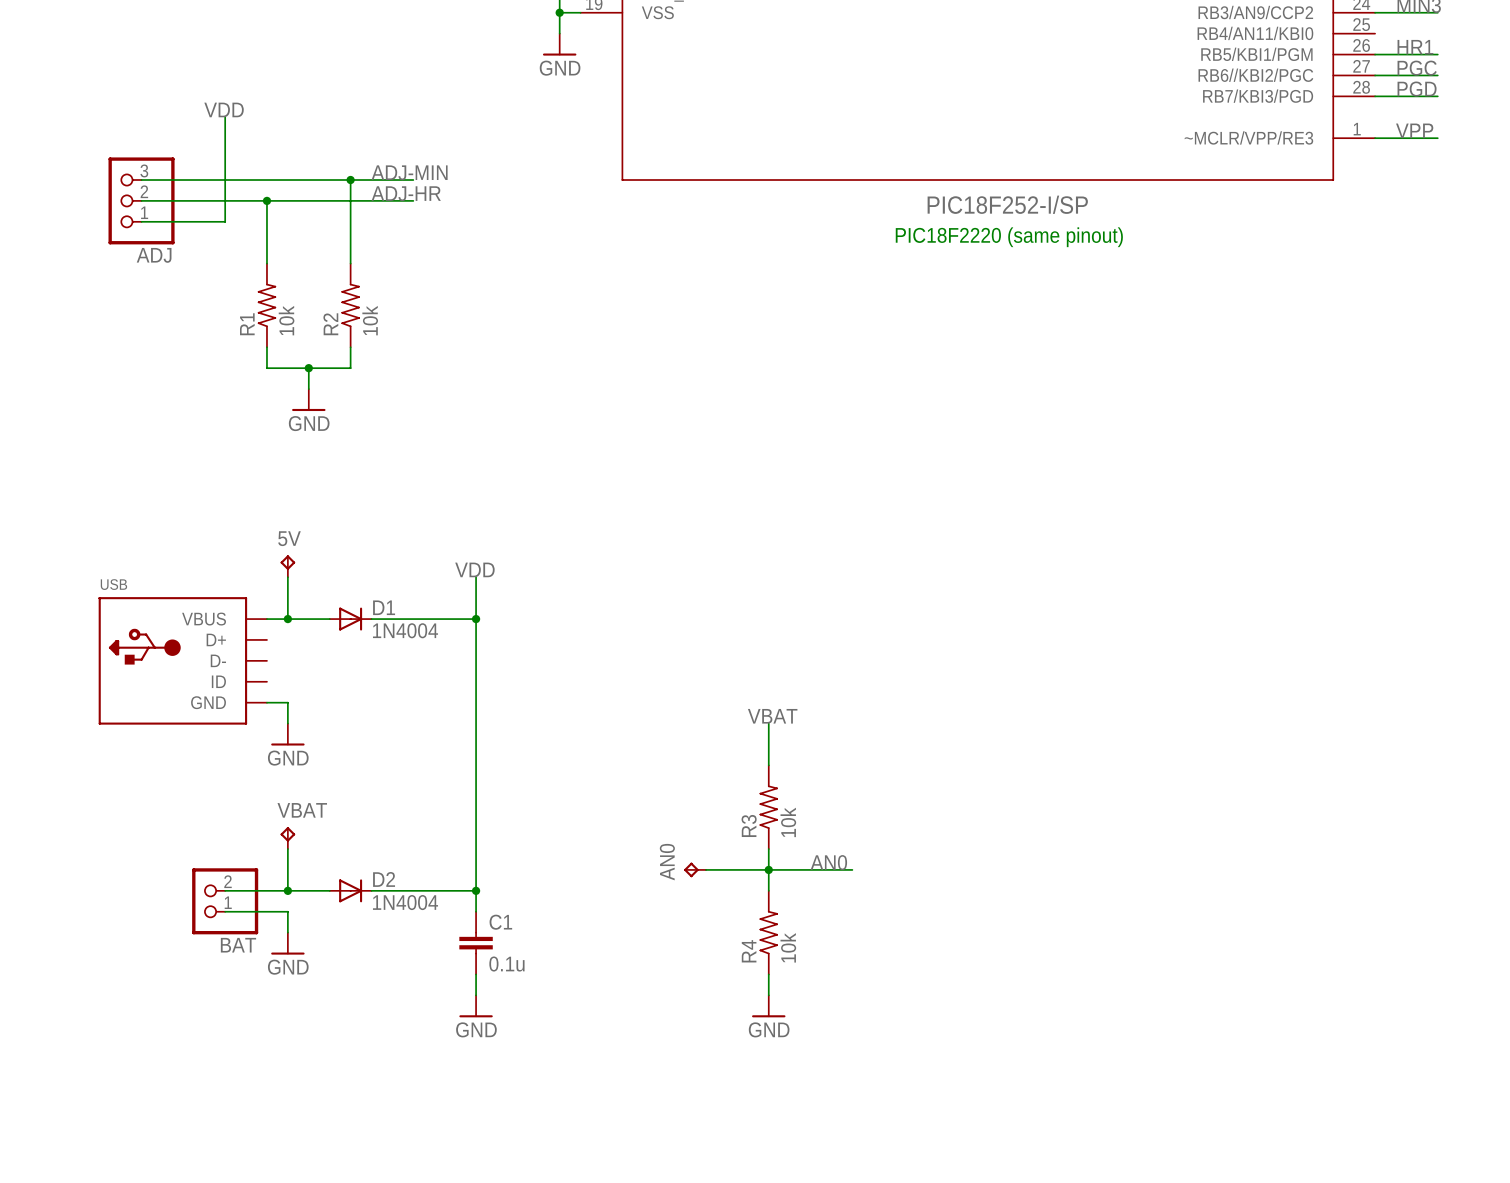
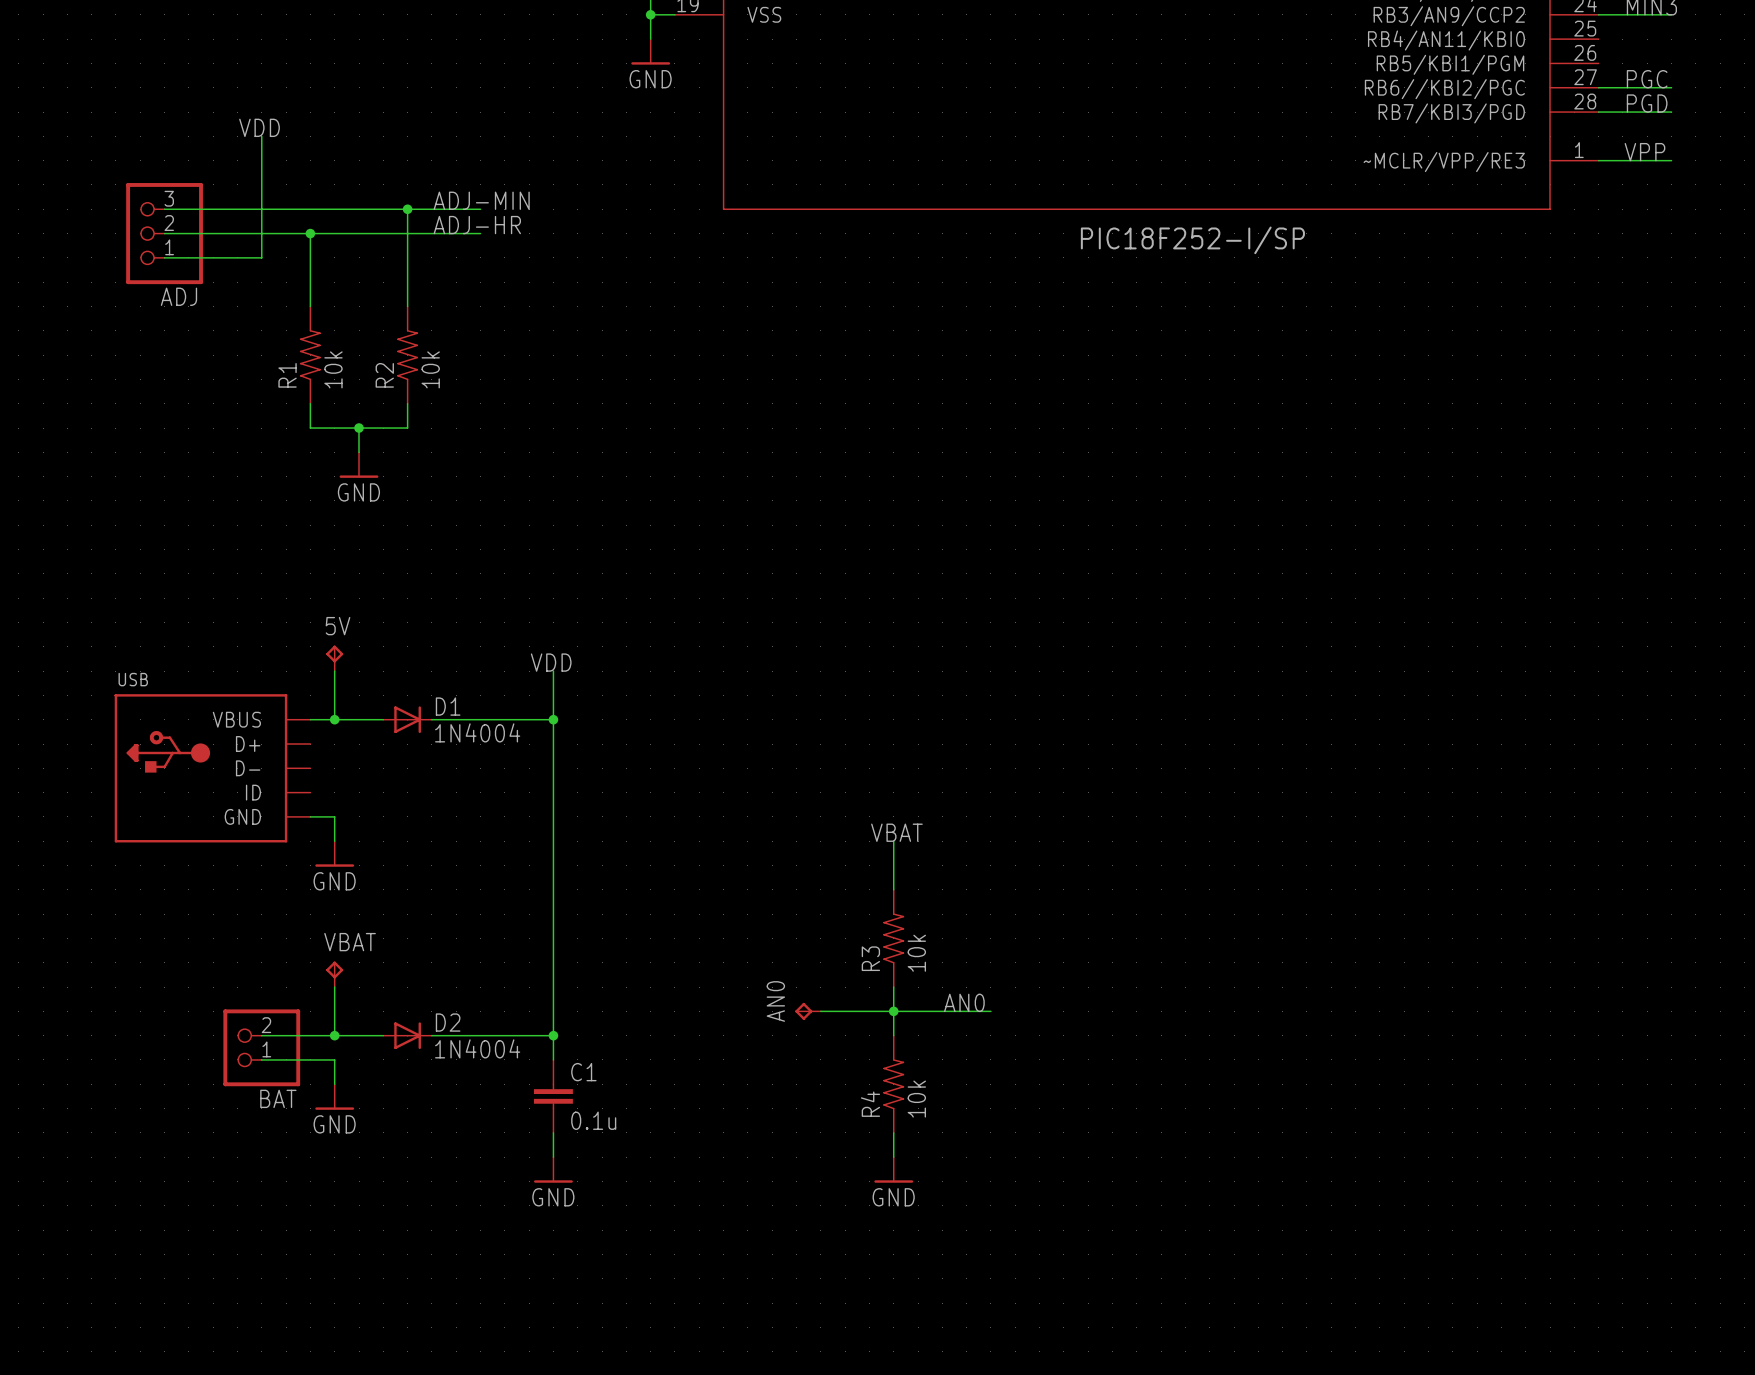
label: HR1 (1415, 47) -> none
wire: (1375, 54) (1437, 54) -> none
text: PIC18F2220 (same pinout) (1009, 237) -> none

